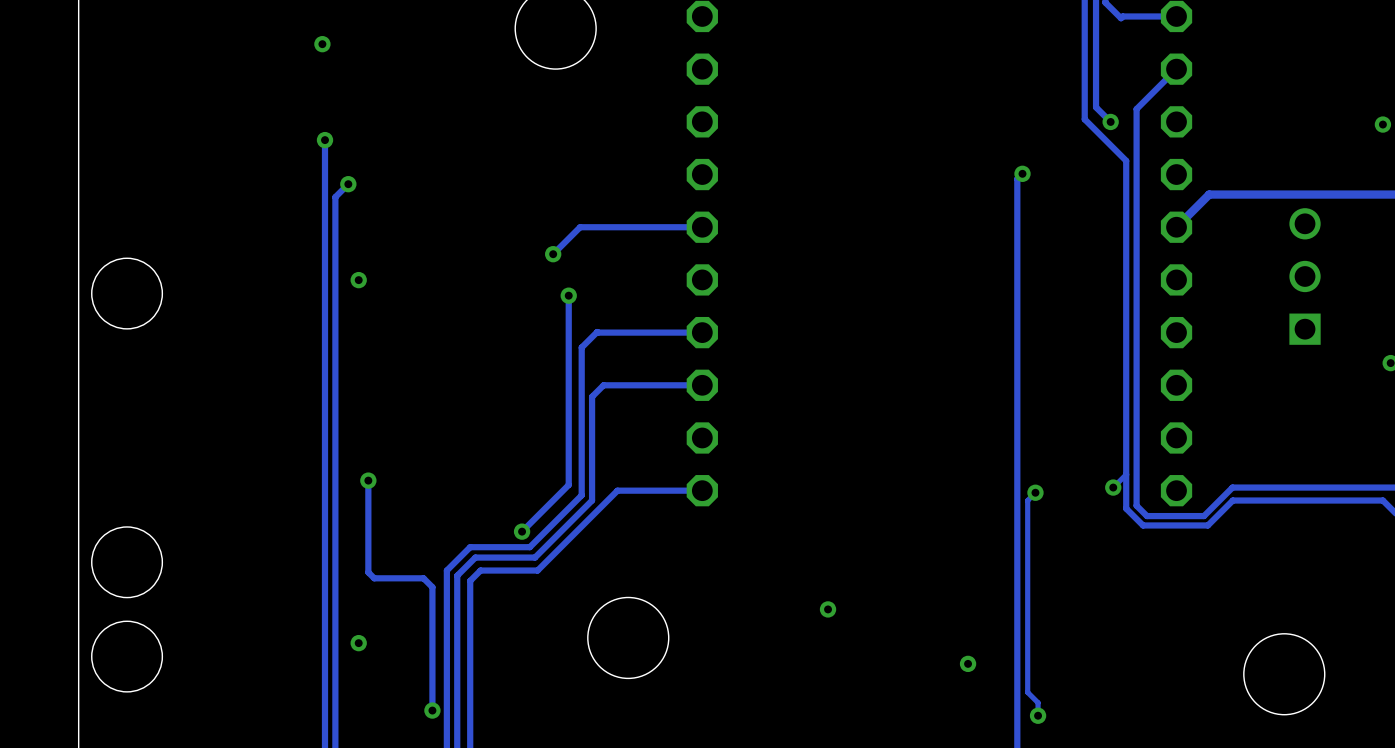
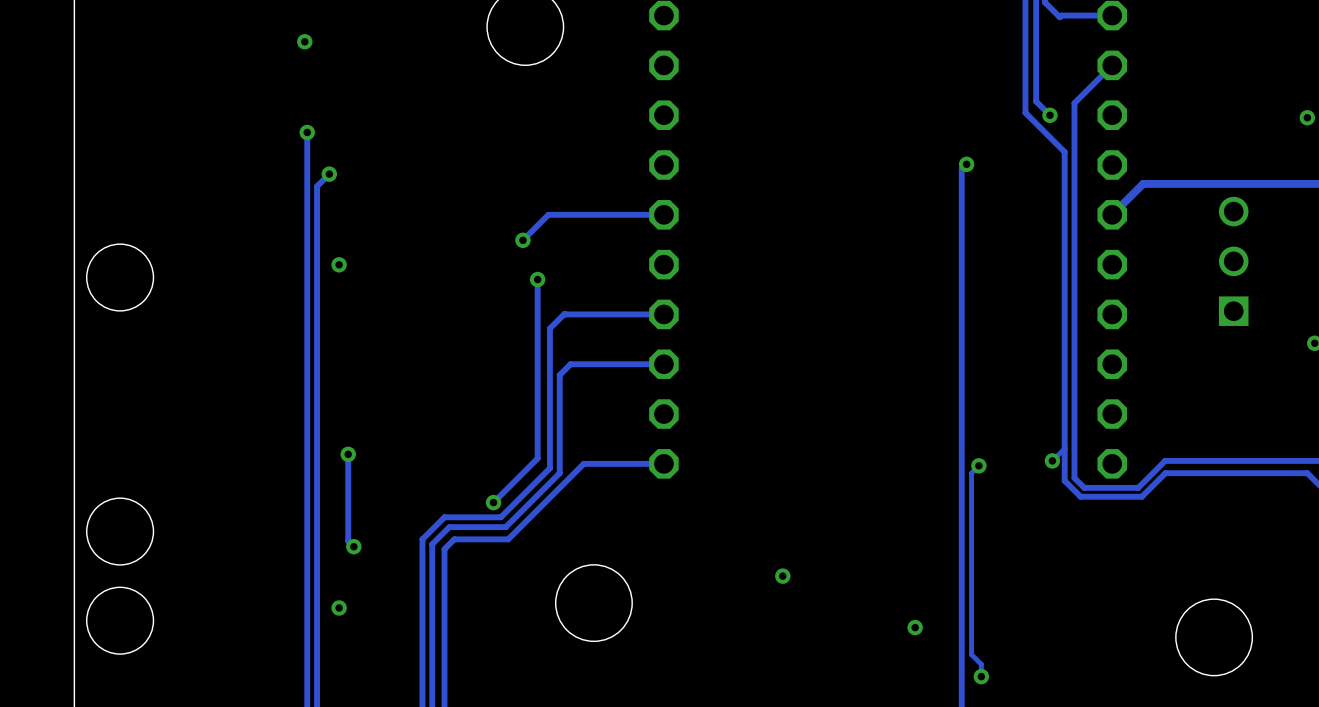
track: (374, 578) (423, 578) (432, 587) (432, 710) -> none
via: none -> (353, 546)
via: (432, 710) -> none

